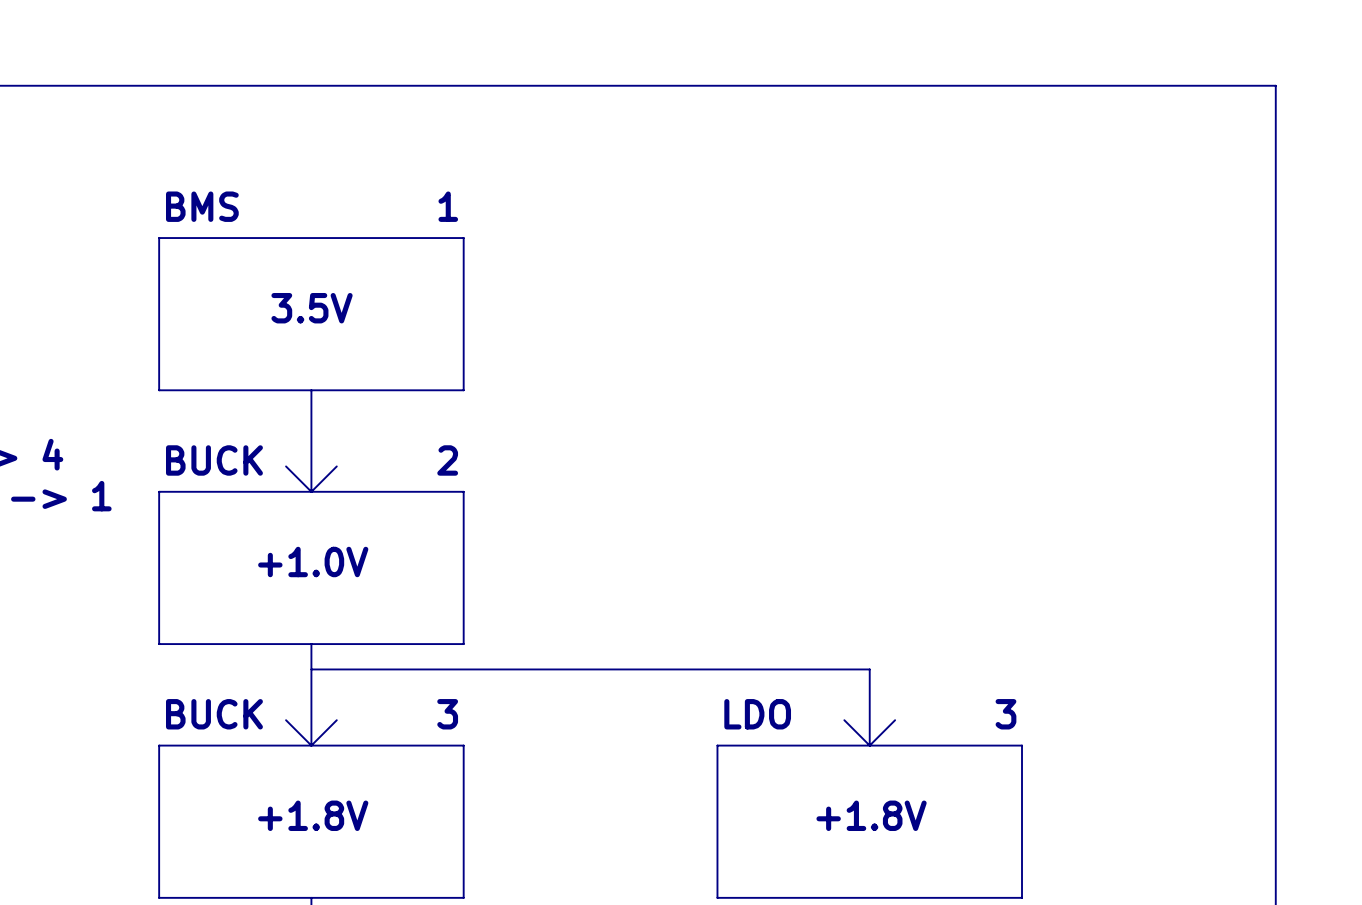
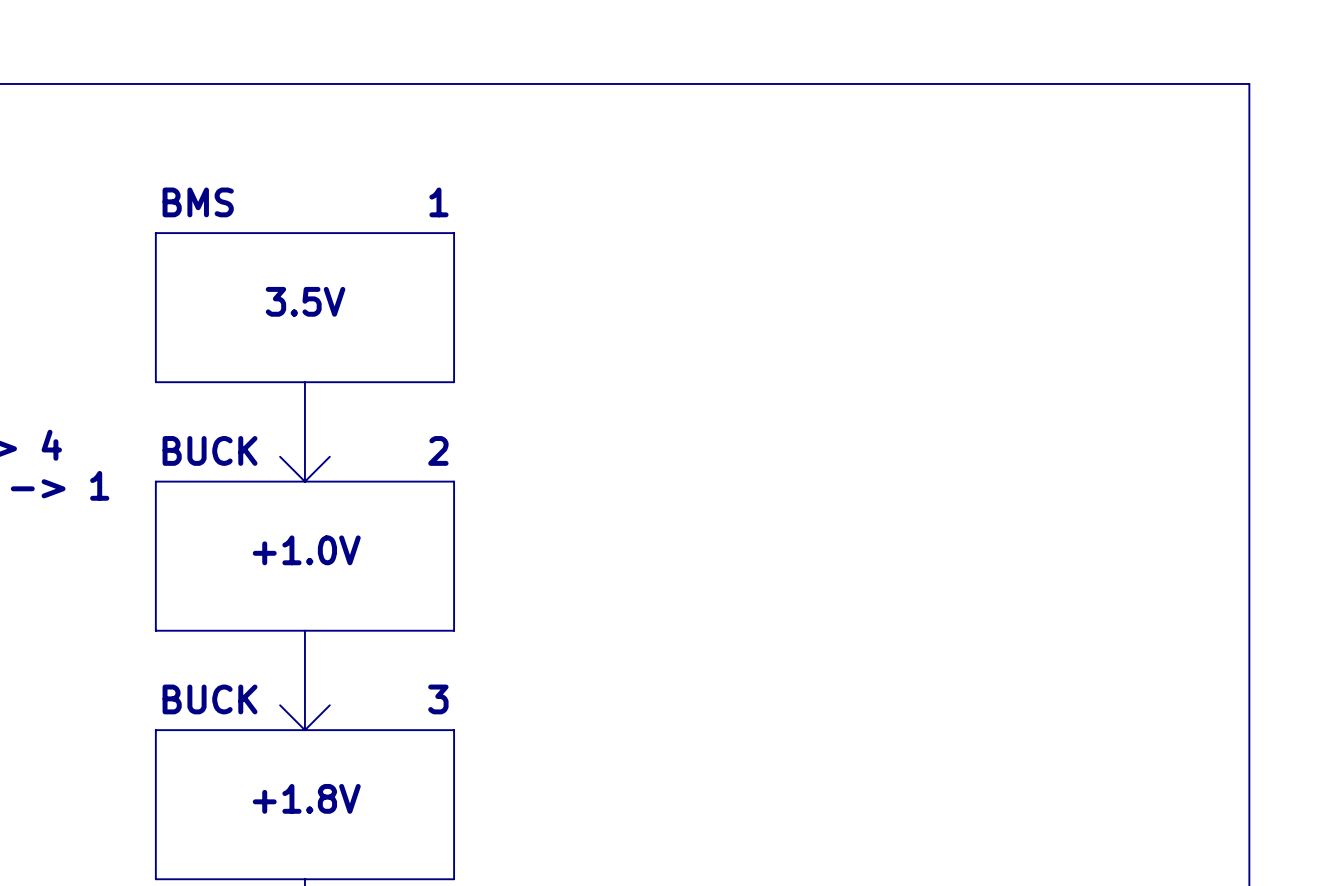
line: (311, 669) (869, 669) (869, 745) -> none
text: LDO (757, 714) -> none
text: 3 (1005, 714) -> none
line: (844, 720) (869, 745) -> none
line: (895, 720) (869, 745) -> none
line: (717, 745) (1022, 745) (1022, 897) (717, 897) (717, 745) -> none
text: +1.8V (871, 815) -> none

